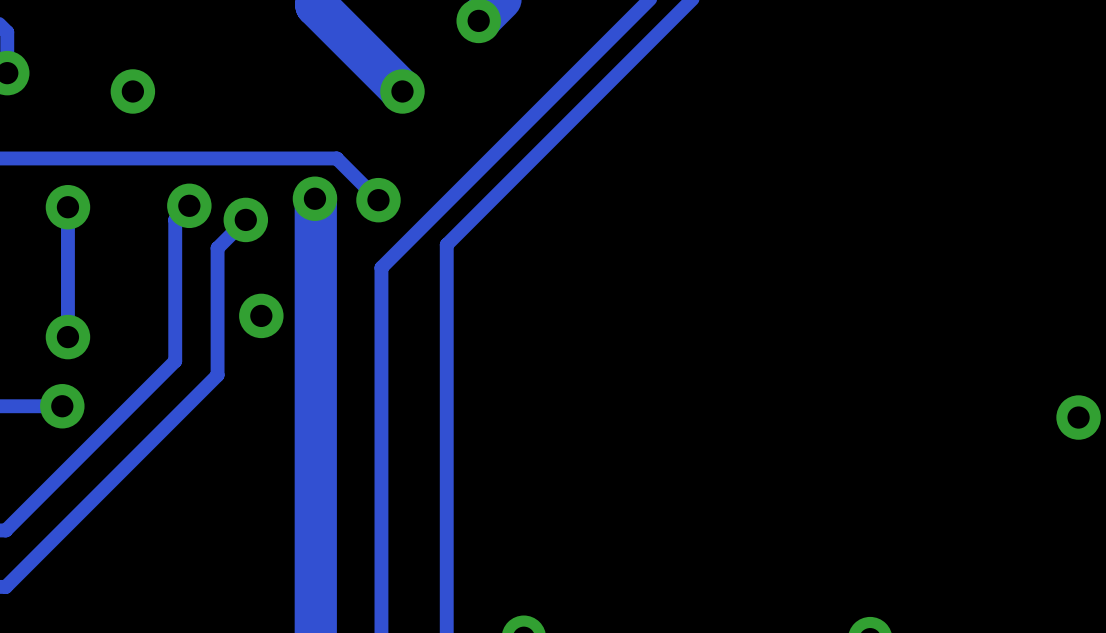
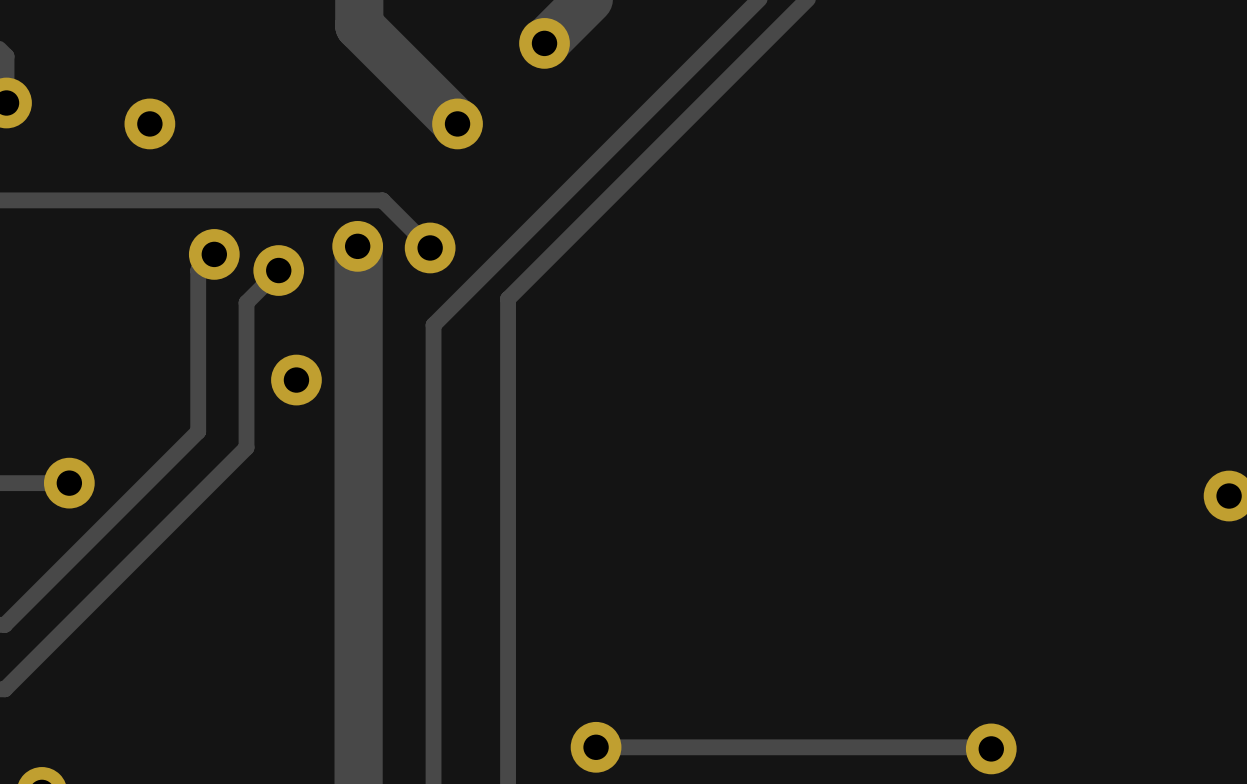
track: (67, 207) (67, 337) -> none
via: (67, 207) -> none
via: (67, 337) -> none

